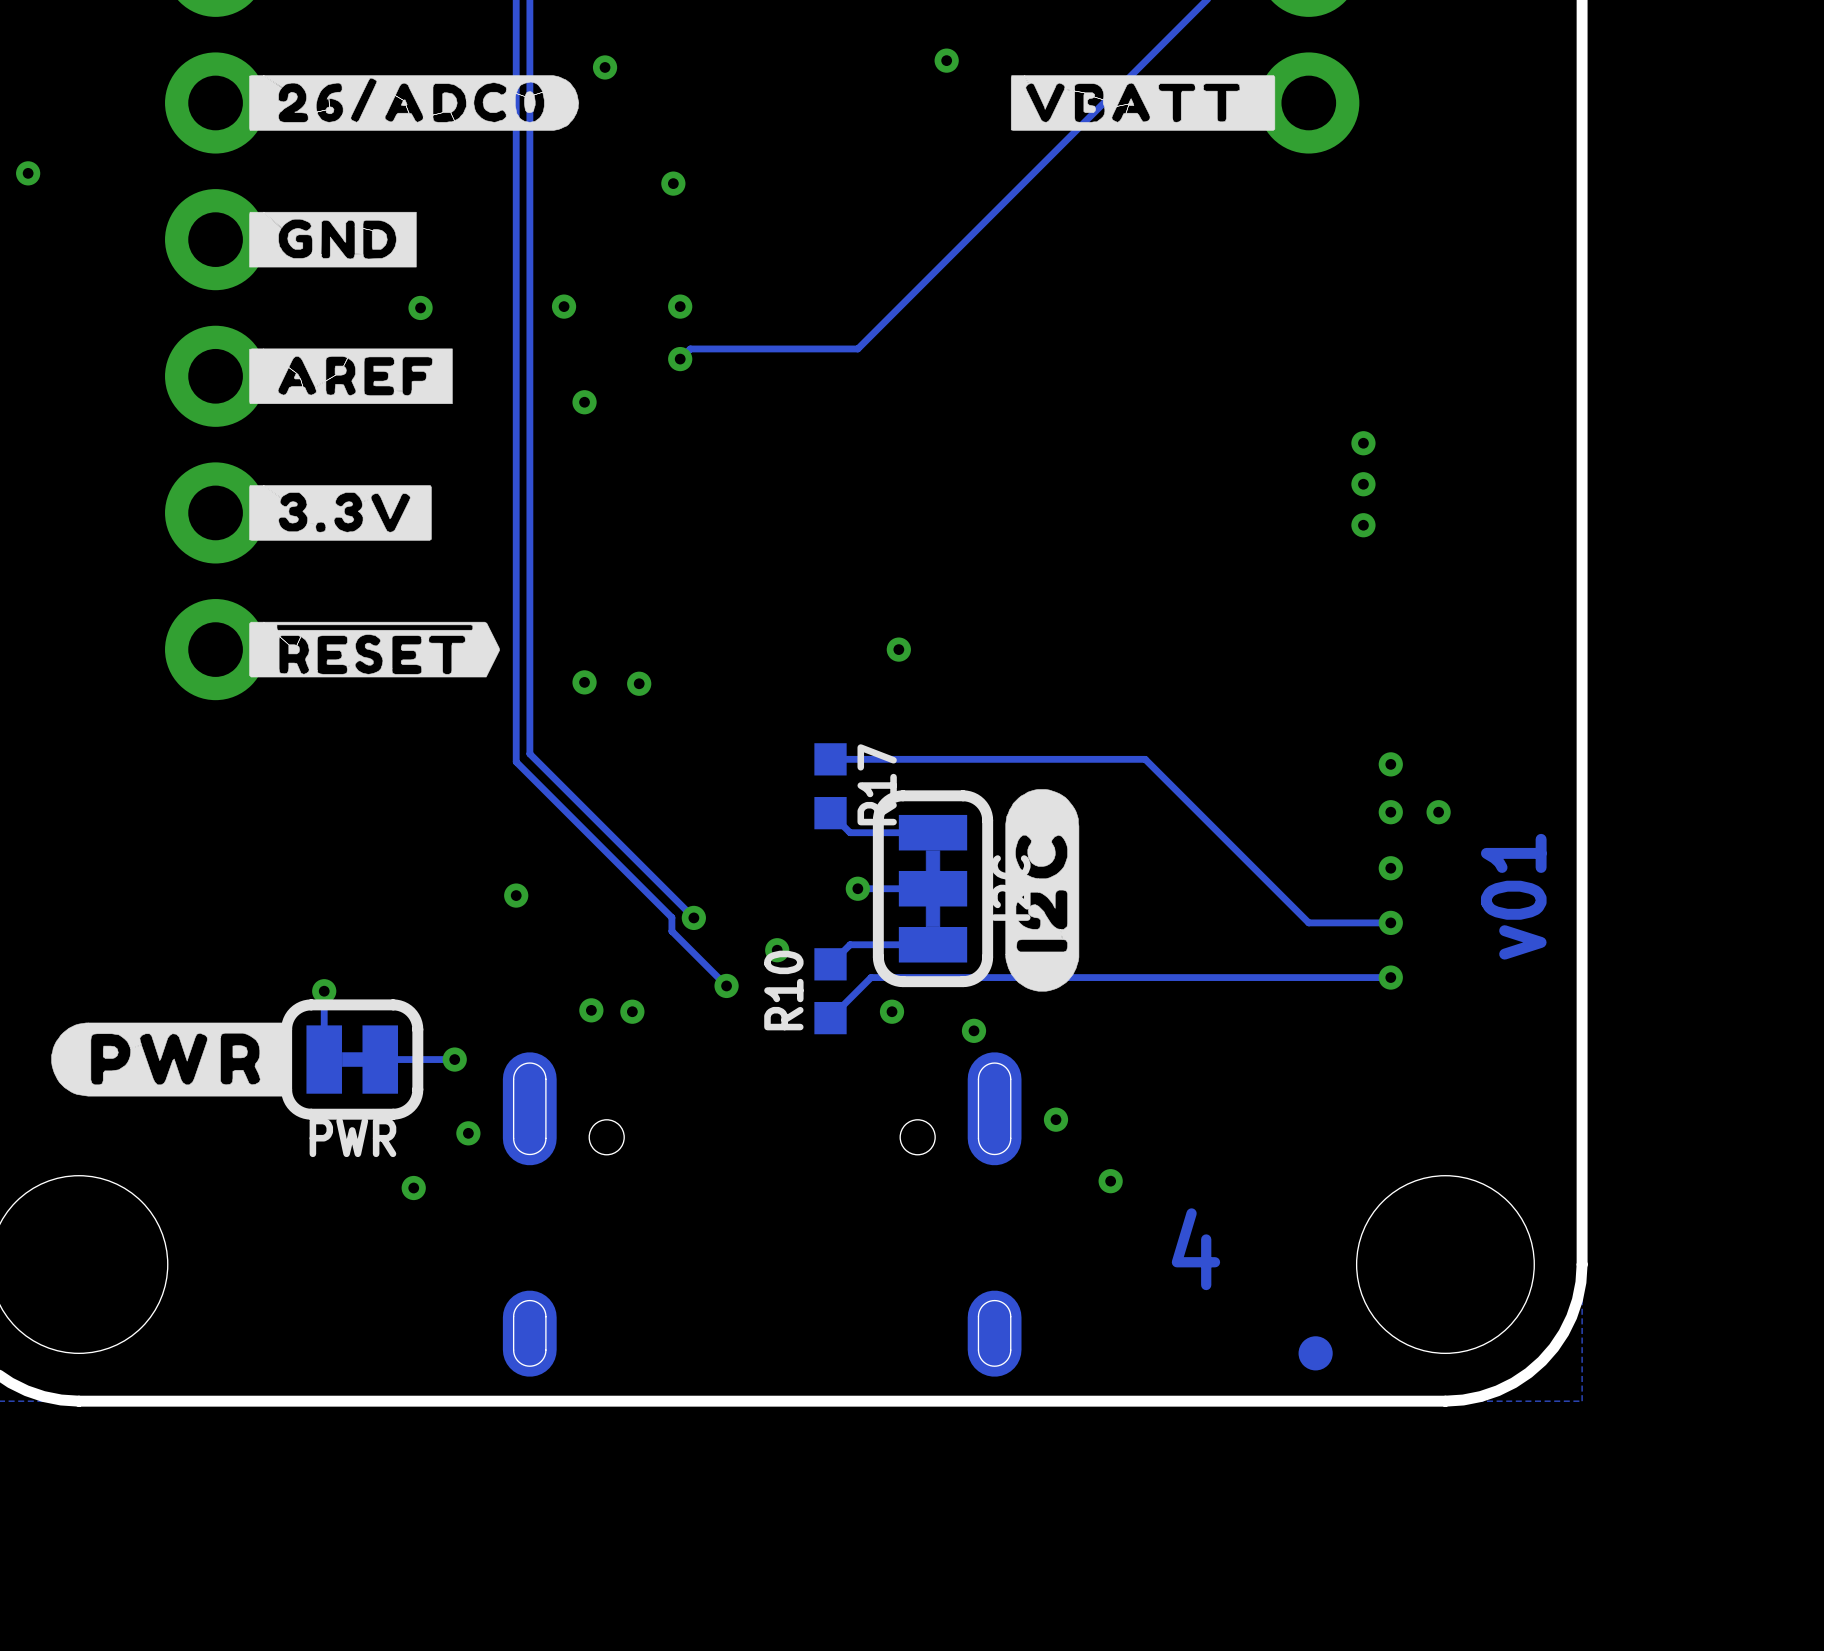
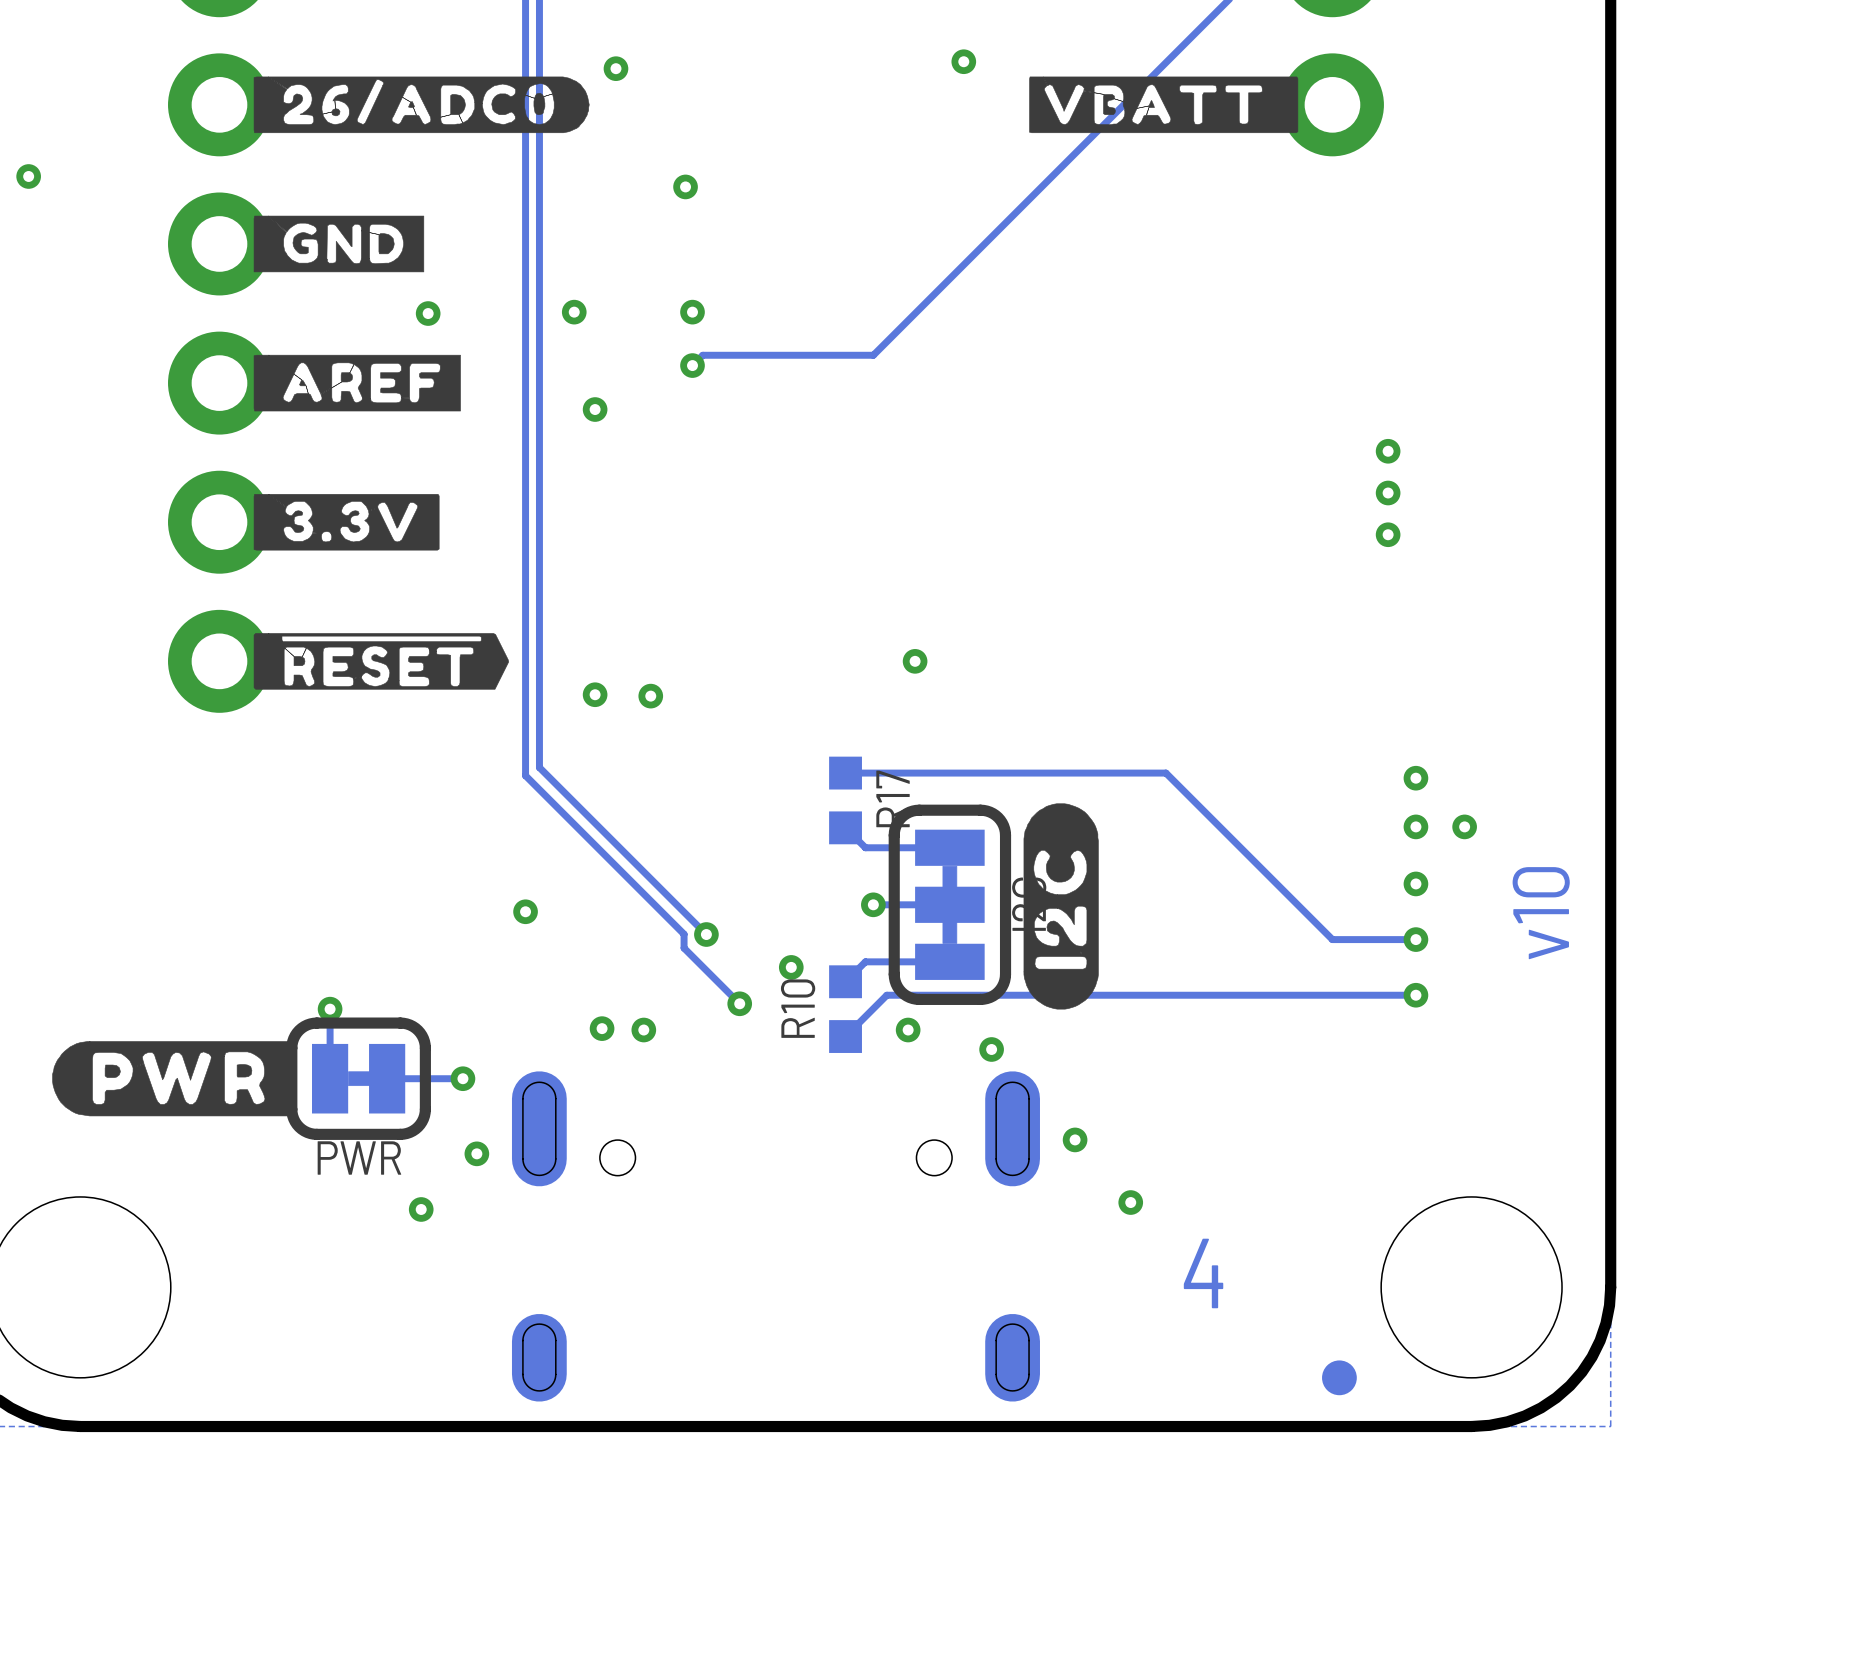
text: v01 (1513, 896) -> v10 (1541, 913)

